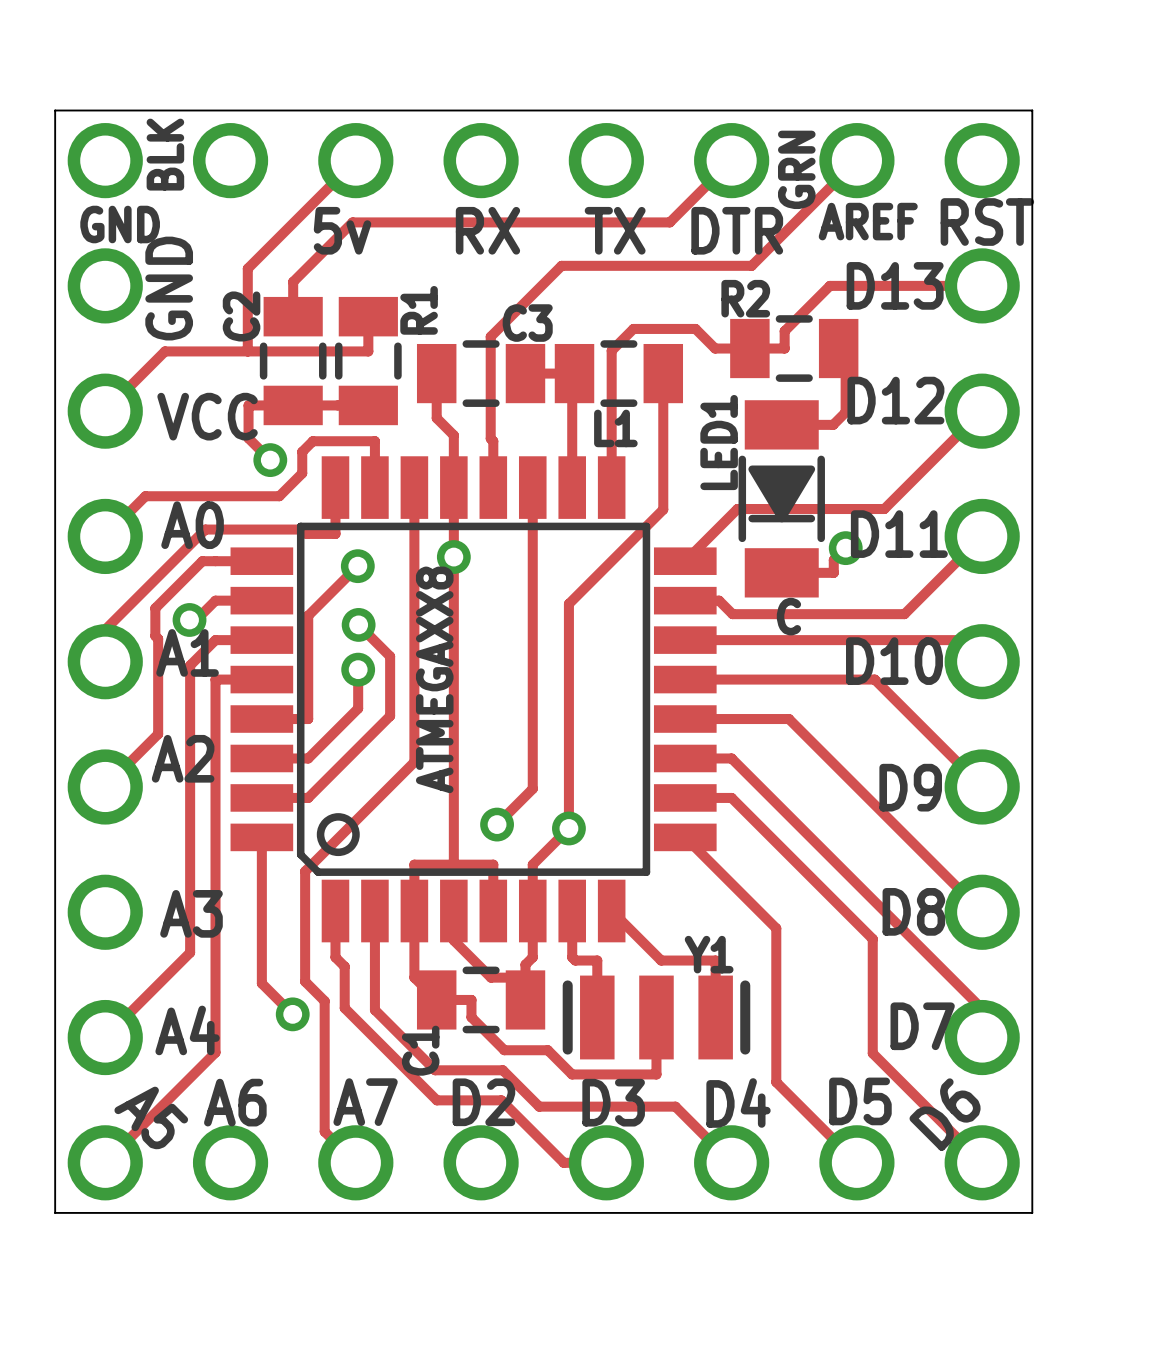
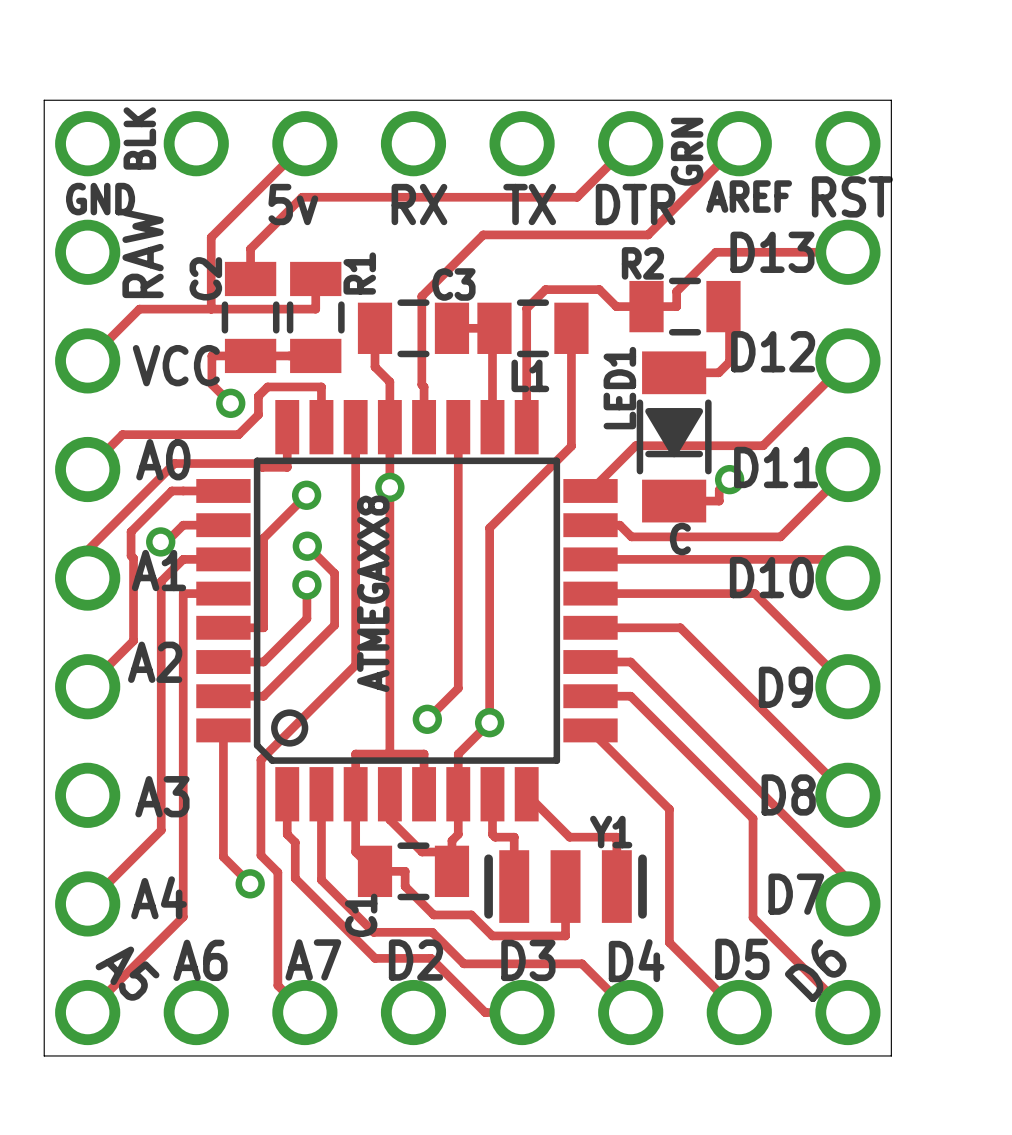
text: GND (169, 288) -> RAW (143, 253)

